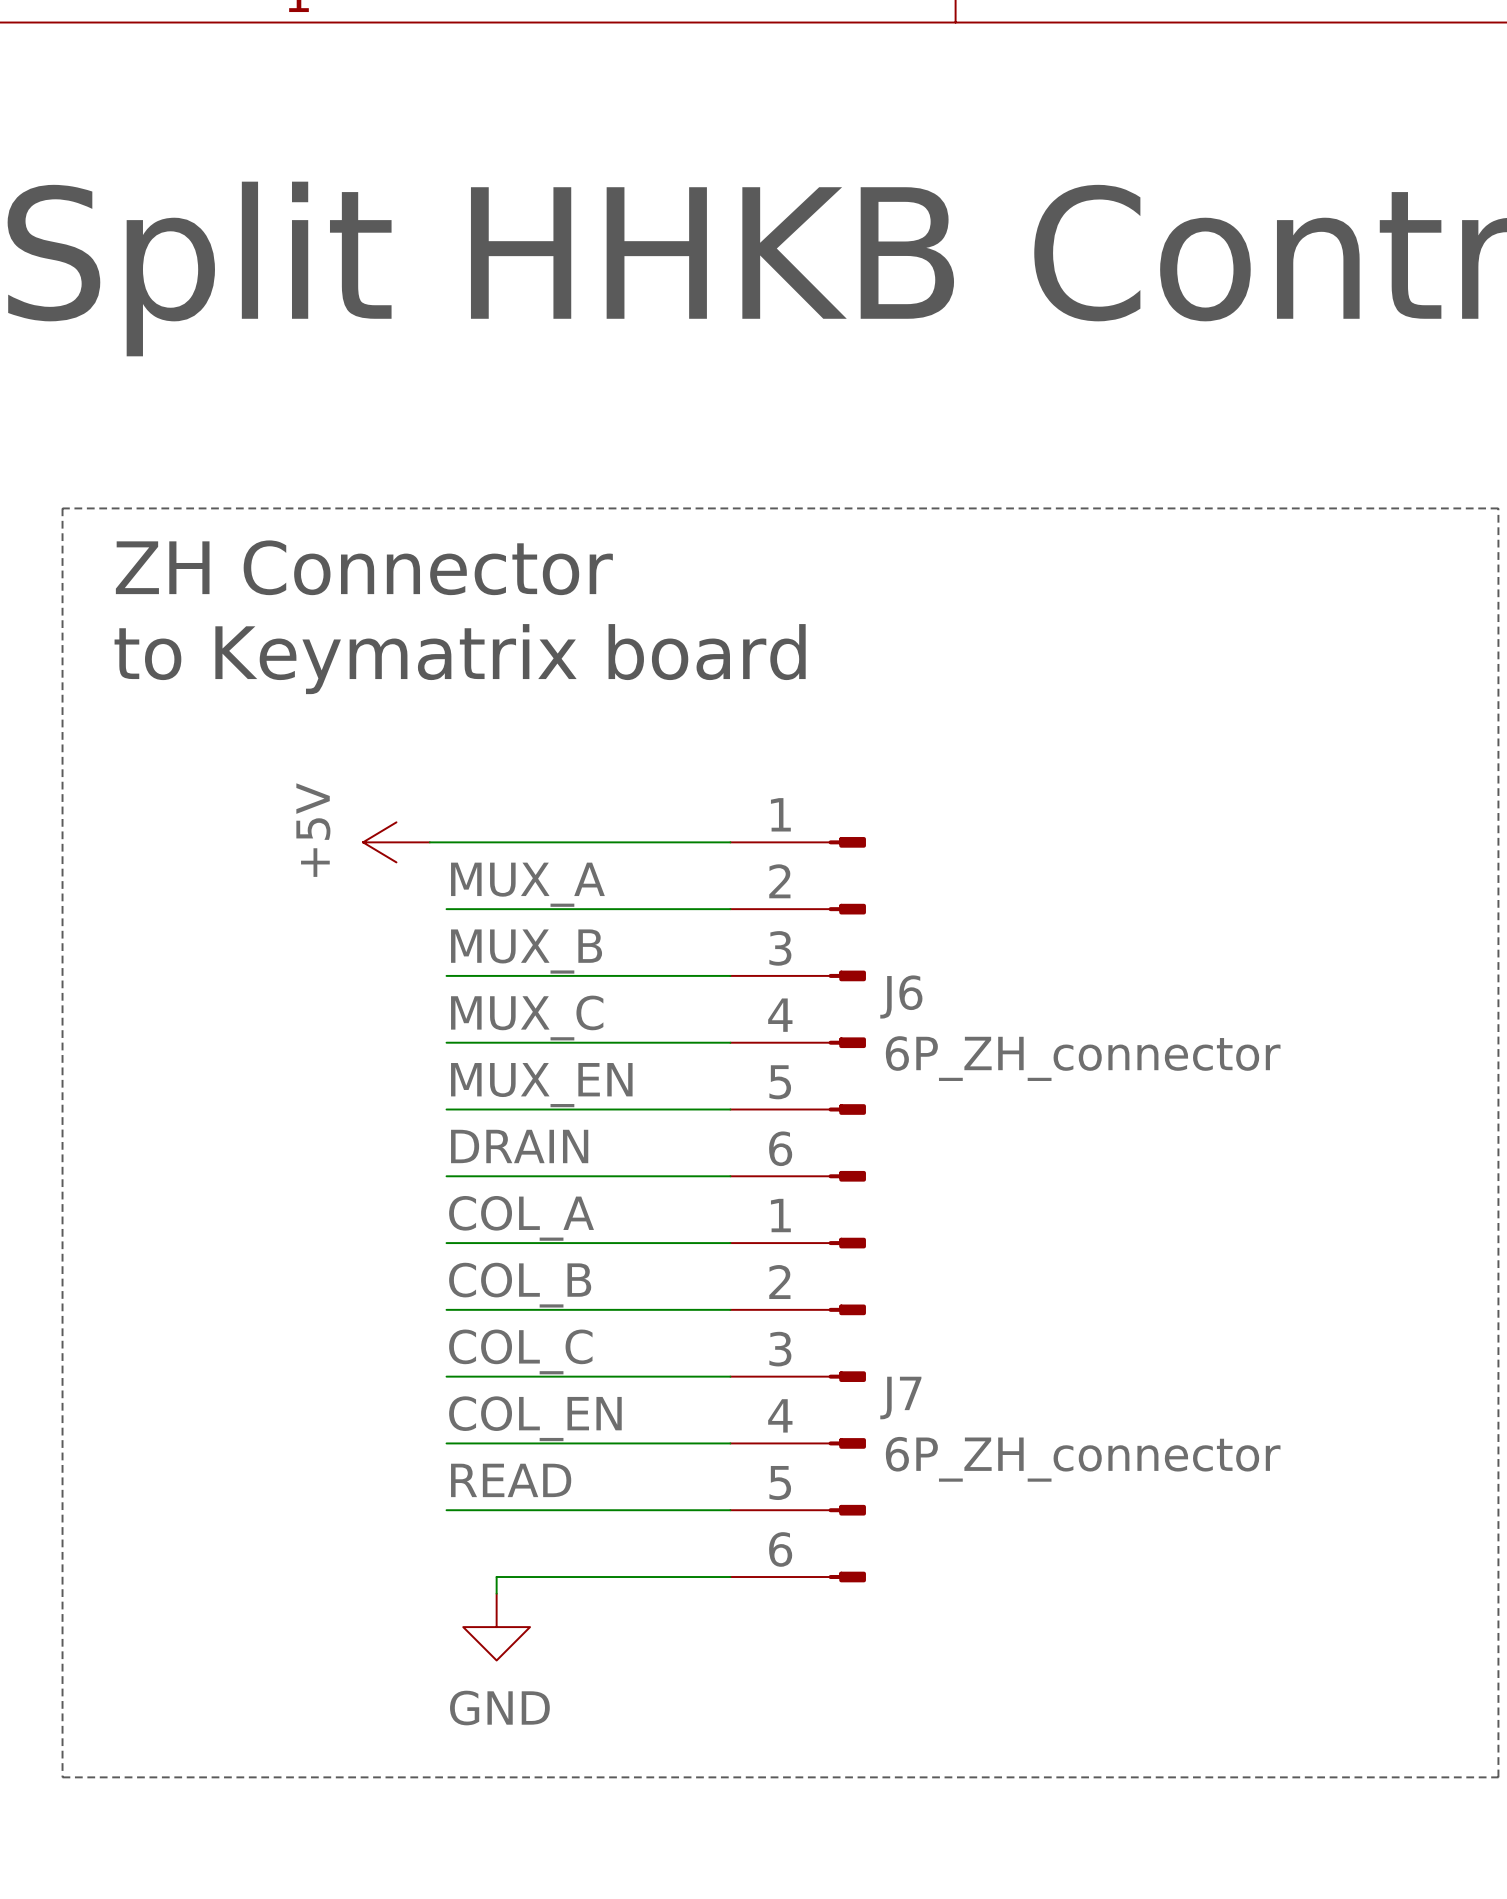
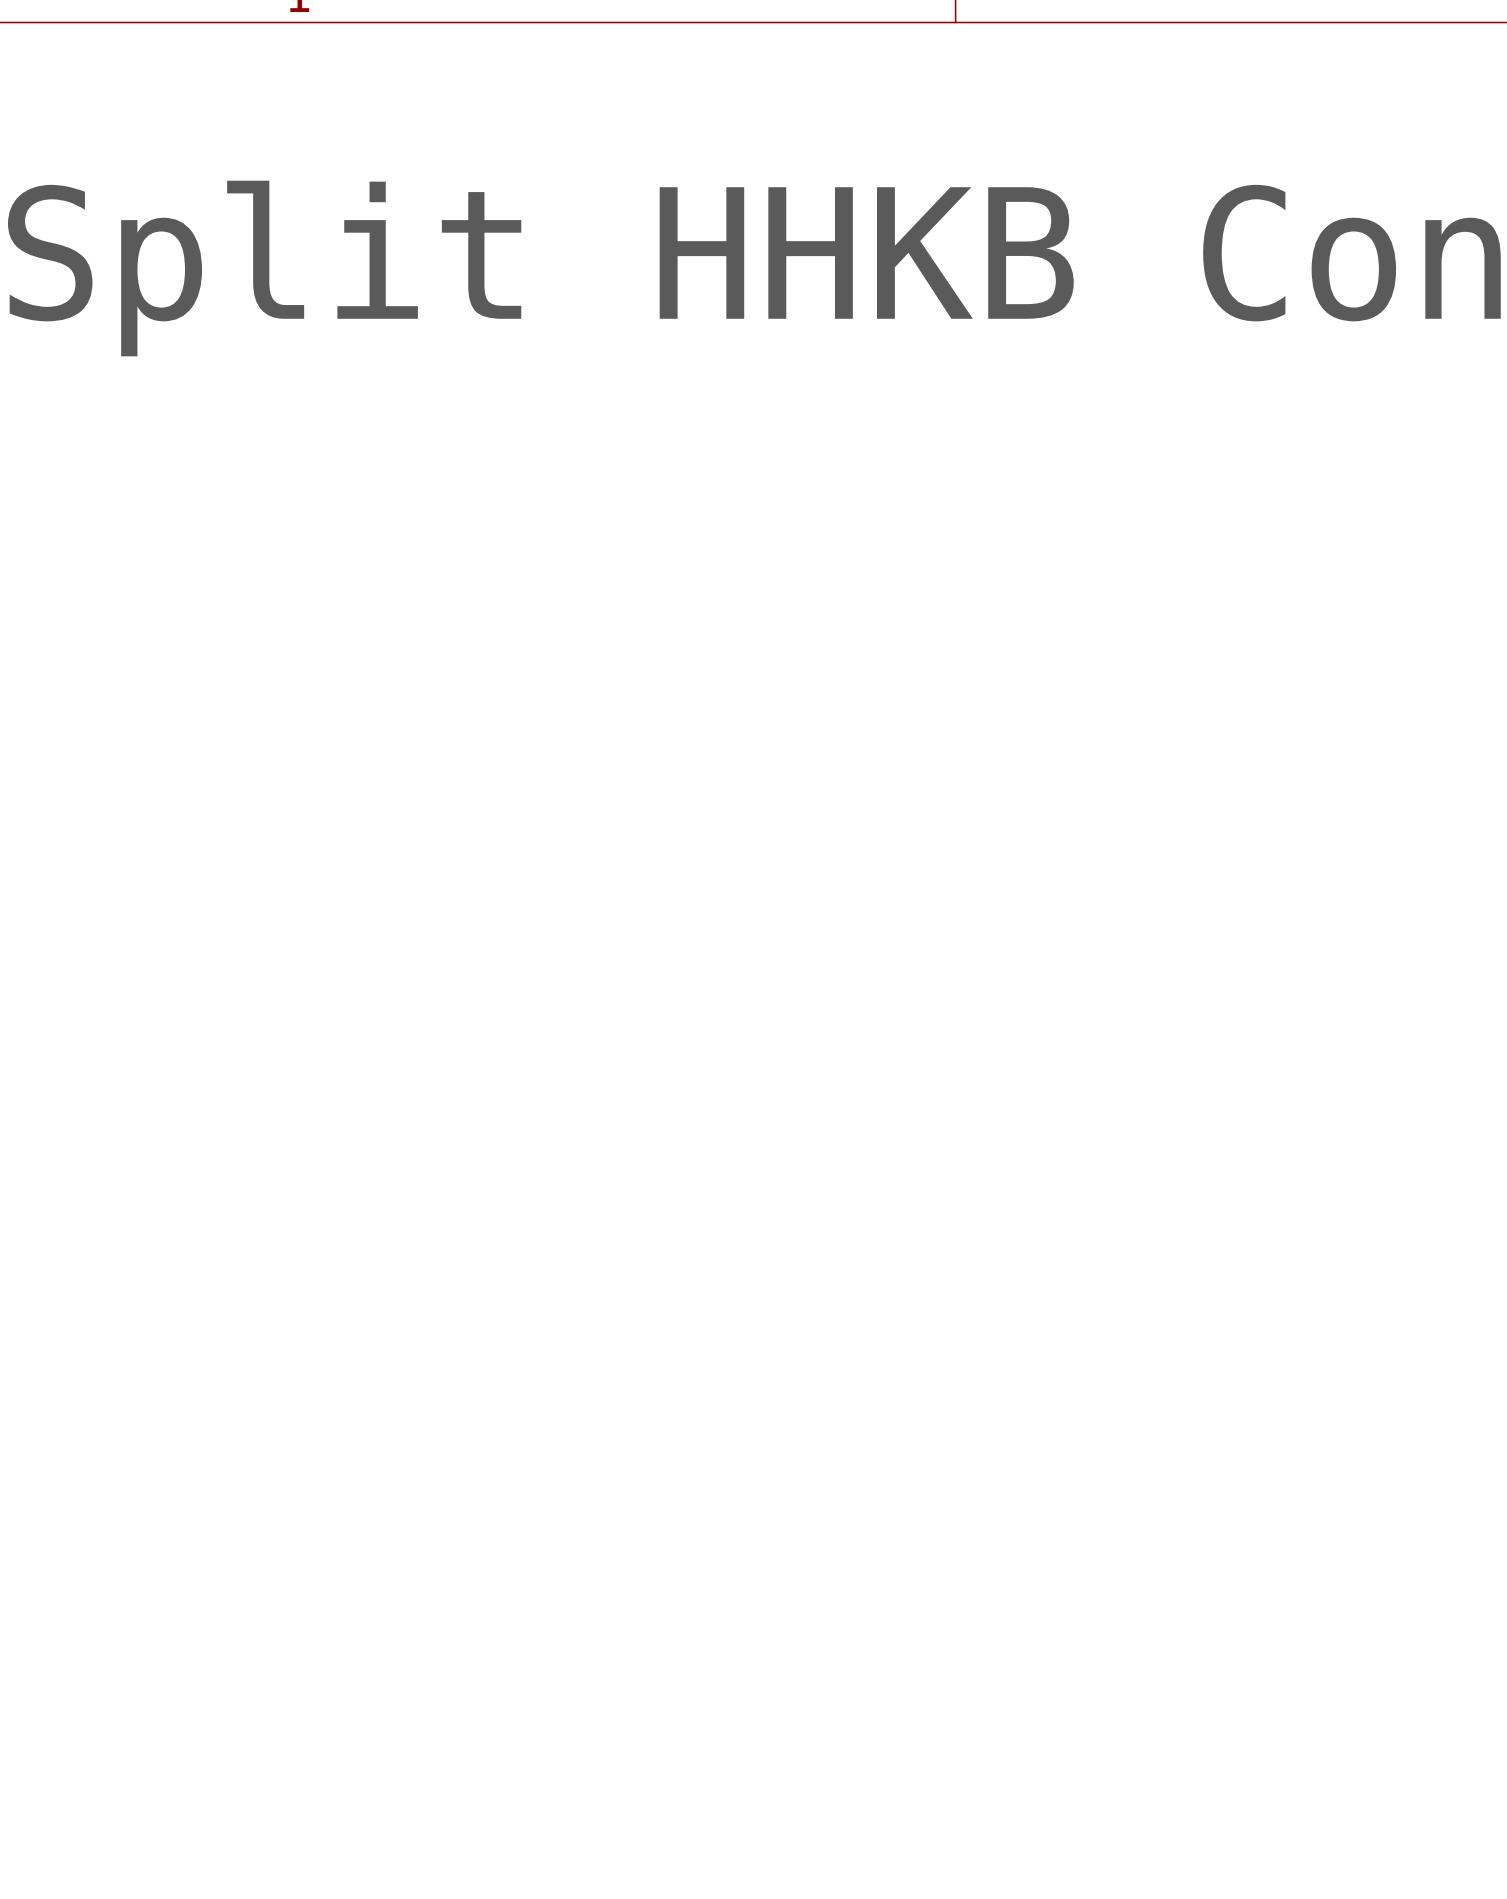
line: (62, 508) (62, 1777) (1498, 1777) (1498, 508) (62, 508) -> none
text: ZH Connector (364, 567) -> none
text: to Keymatrix board (460, 659) -> none
power symbol: +5V (396, 842) -> none
wire: (429, 842) (730, 842) -> none
label: MUX_A (527, 884) -> none
wire: (446, 909) (730, 909) -> none
label: MUX_B (526, 951) -> none
wire: (446, 975) (730, 975) -> none
J6: 6P_ZH_connector (798, 1009) -> none
label: MUX_C (527, 1018) -> none
wire: (446, 1042) (730, 1042) -> none
label: MUX_EN (541, 1085) -> none
wire: (446, 1109) (730, 1109) -> none
label: DRAIN (519, 1146) -> none
wire: (446, 1176) (730, 1176) -> none
label: COL_A (521, 1218) -> none
wire: (446, 1243) (730, 1243) -> none
label: COL_B (520, 1285) -> none
wire: (446, 1309) (730, 1309) -> none
label: COL_C (520, 1351) -> none
wire: (446, 1376) (730, 1376) -> none
J7: 6P_ZH_connector (798, 1410) -> none
label: COL_EN (535, 1418) -> none
wire: (446, 1443) (730, 1443) -> none
label: READ (511, 1480) -> none
wire: (446, 1510) (730, 1510) -> none
wire: (730, 1577) (496, 1577) (496, 1593) -> none
power symbol: GND (496, 1627) -> none

